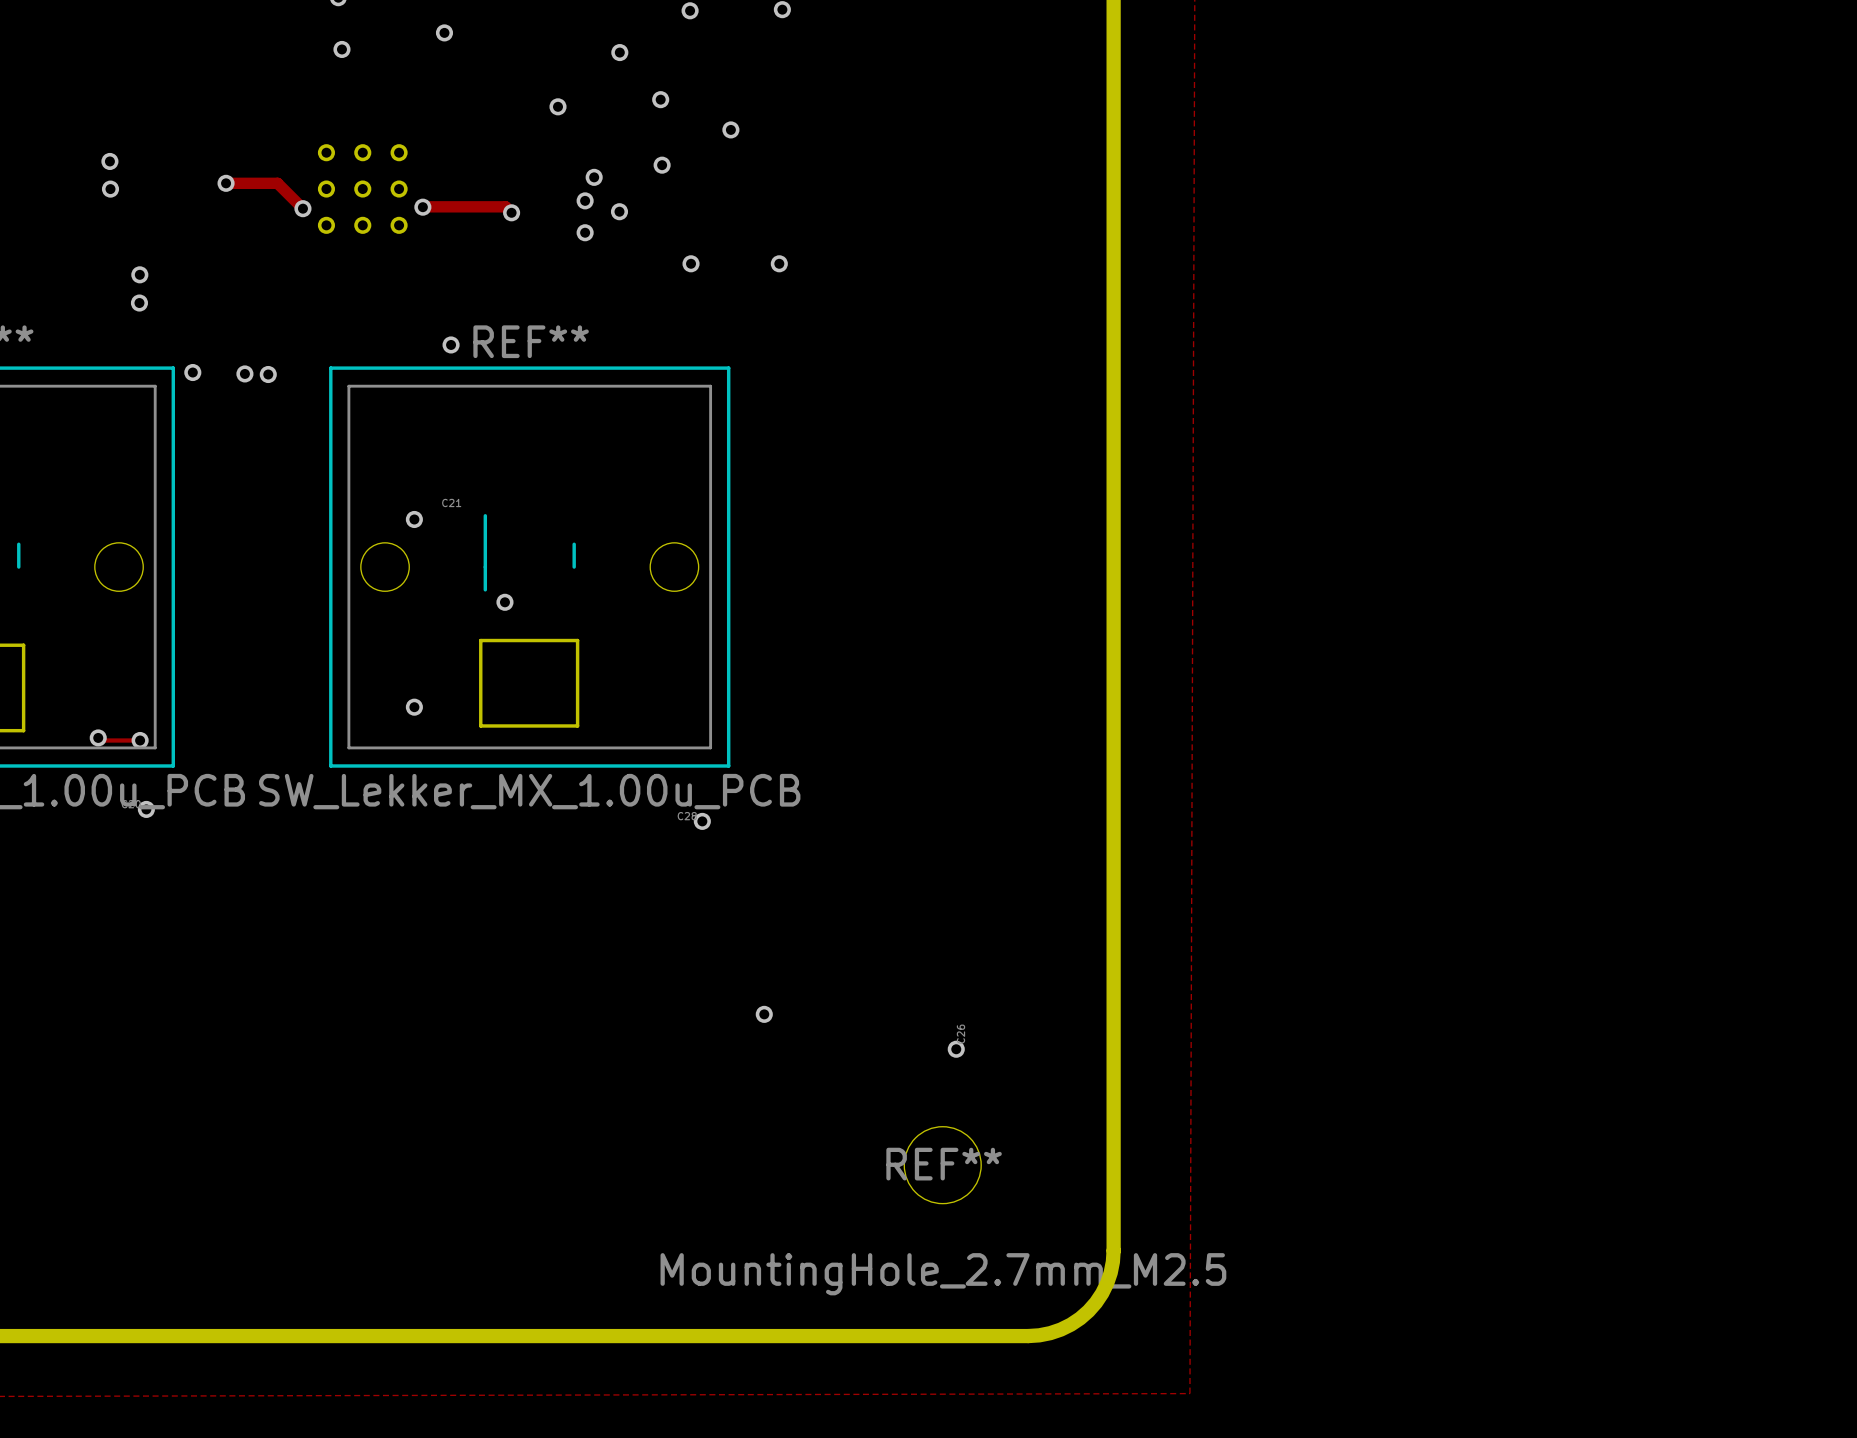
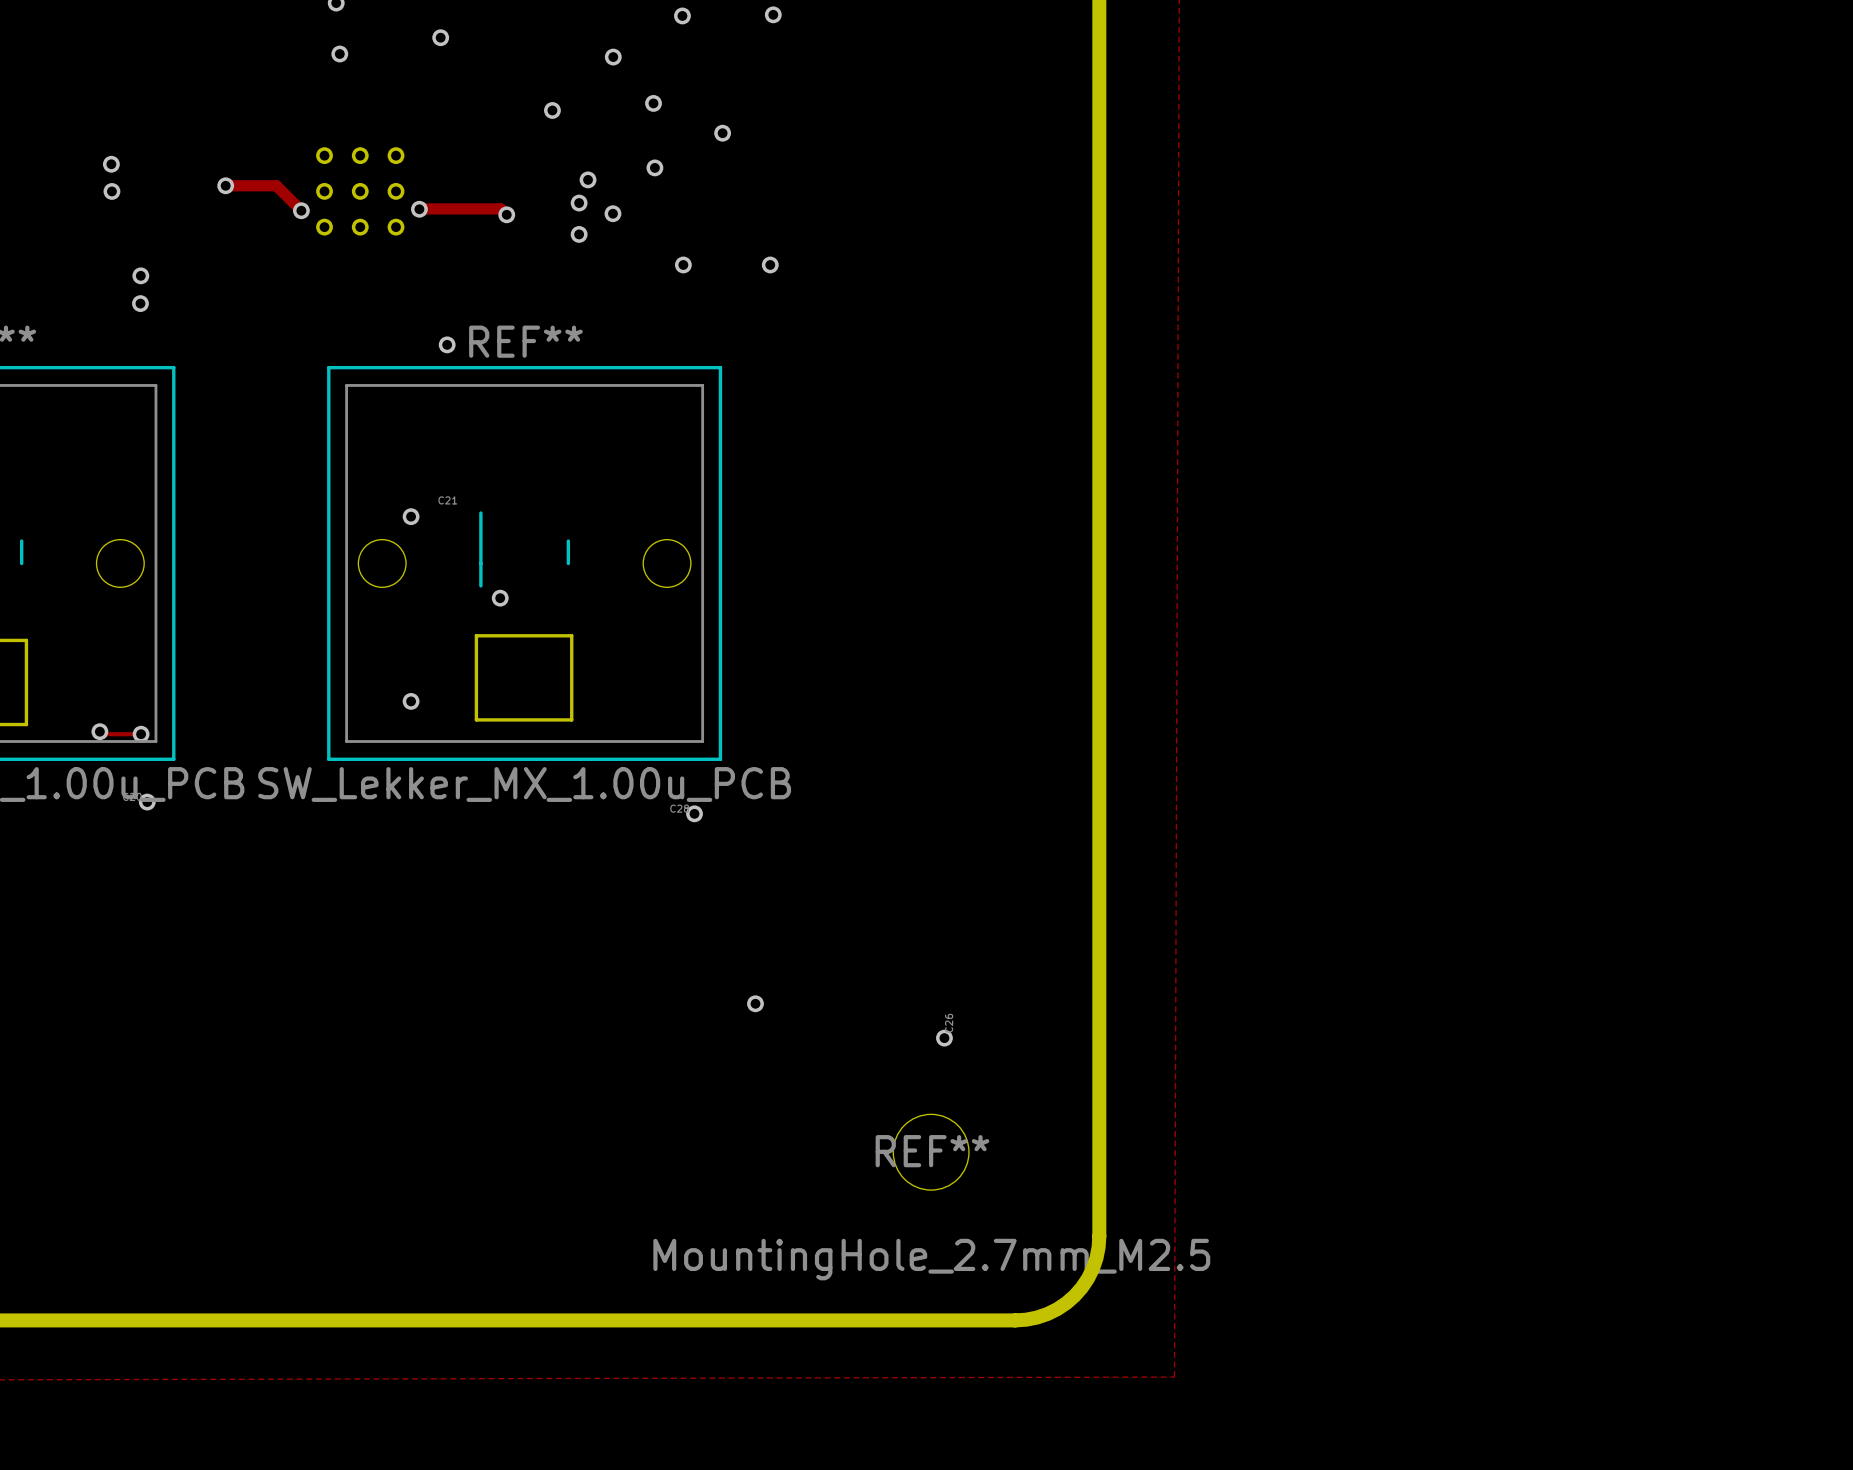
via: (192, 372) -> none
via: (244, 373) -> none
via: (268, 374) -> none

